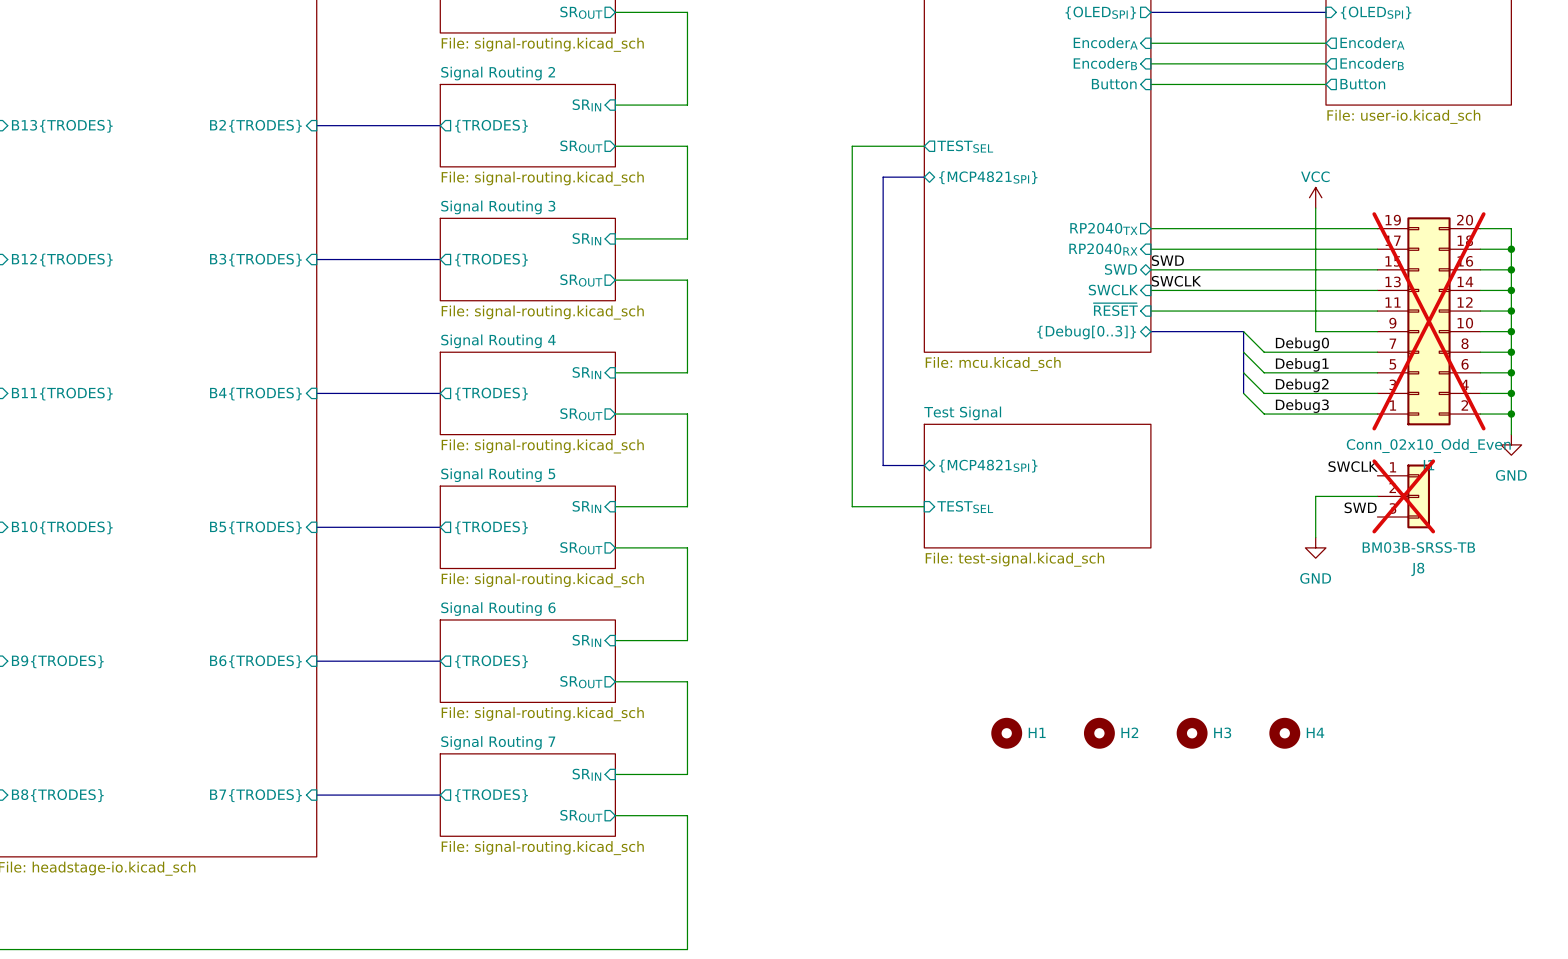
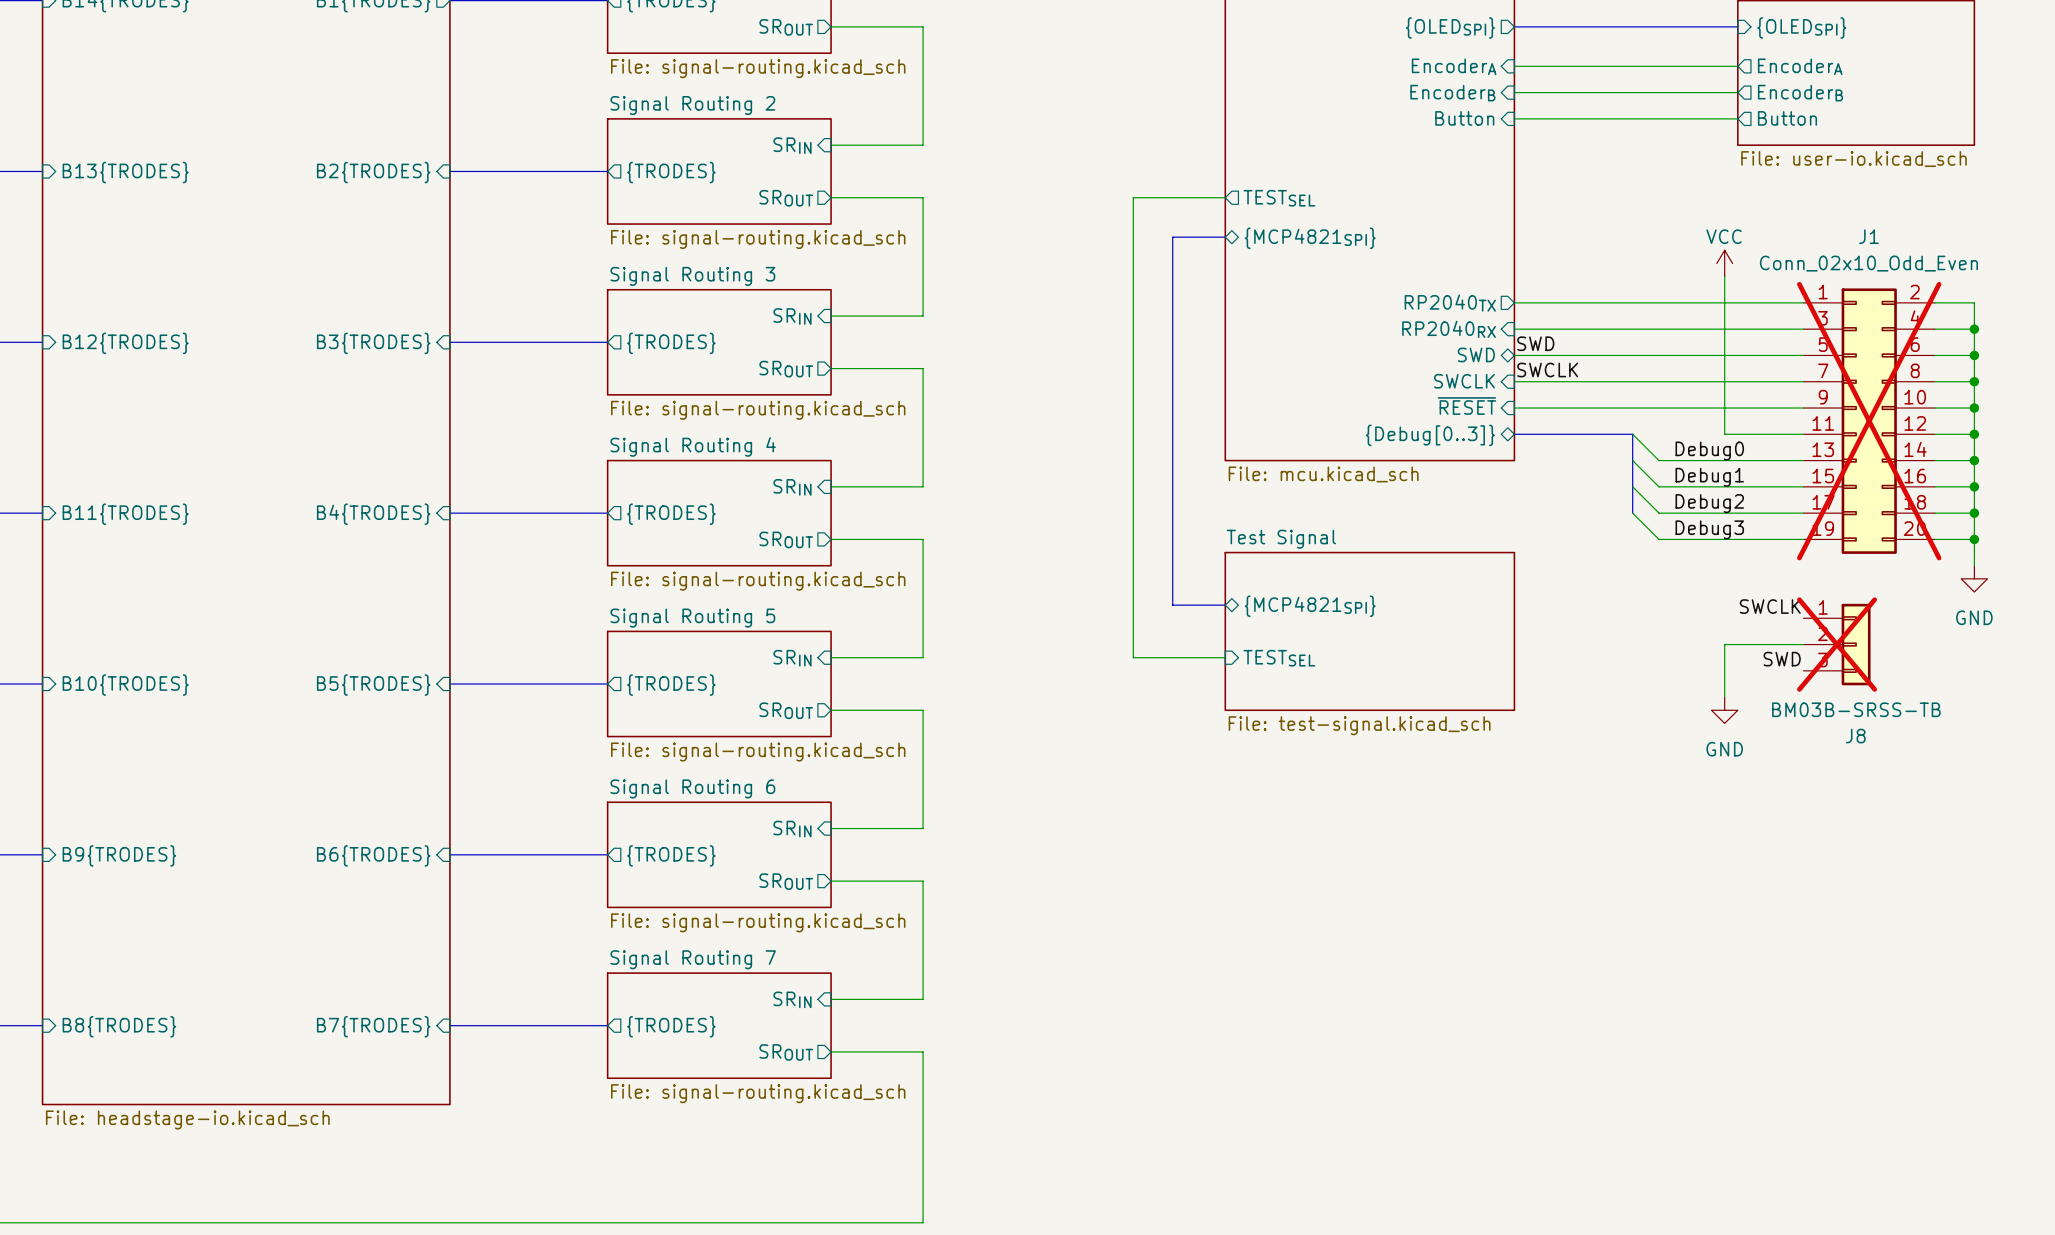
J1 flip: as is (1428, 321) -> up-down (1869, 421)
H1: (1006, 733) -> none
H2: (1099, 733) -> none
H3: (1192, 733) -> none
H4: (1284, 733) -> none

